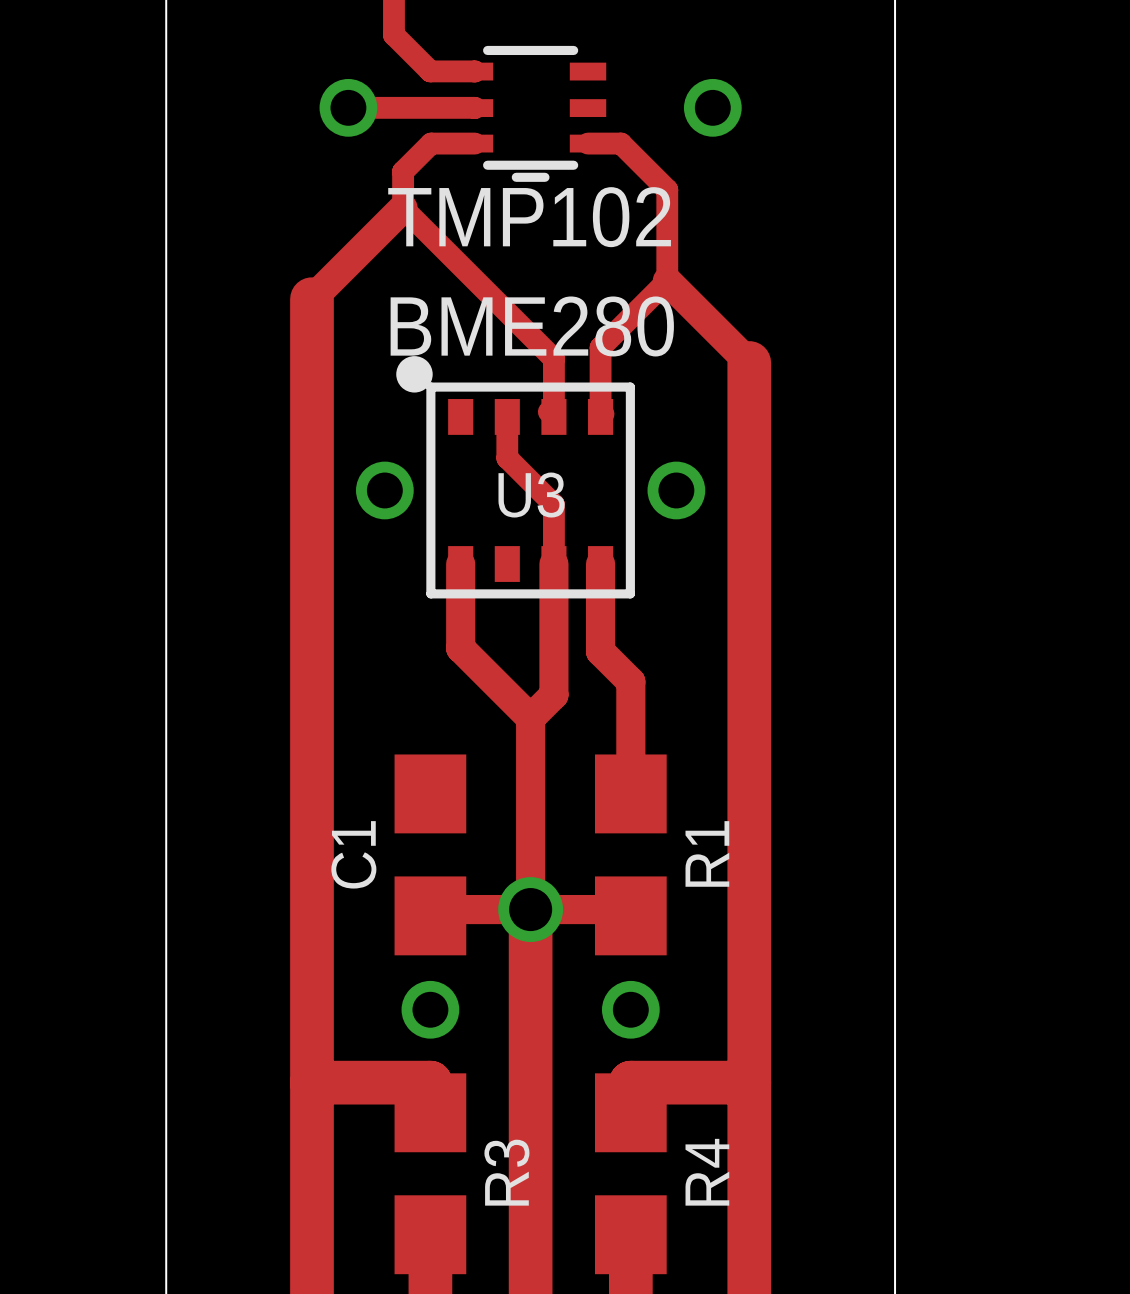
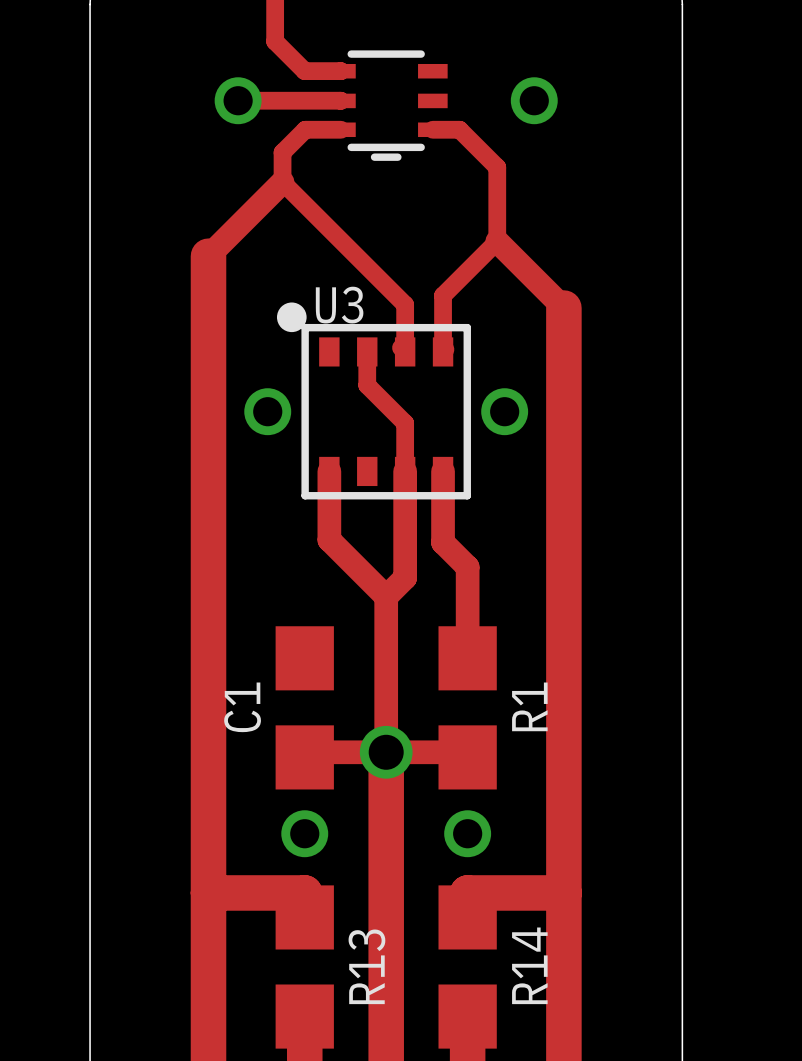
text: TMP102 (529, 217) -> none
U3 value: BME280 (532, 326) -> none
U3 name position: U3 (531, 495) -> U3 (339, 305)
R3 name: R3 (506, 1172) -> R13 (366, 966)
R4 name: R4 (707, 1172) -> R14 (529, 965)

